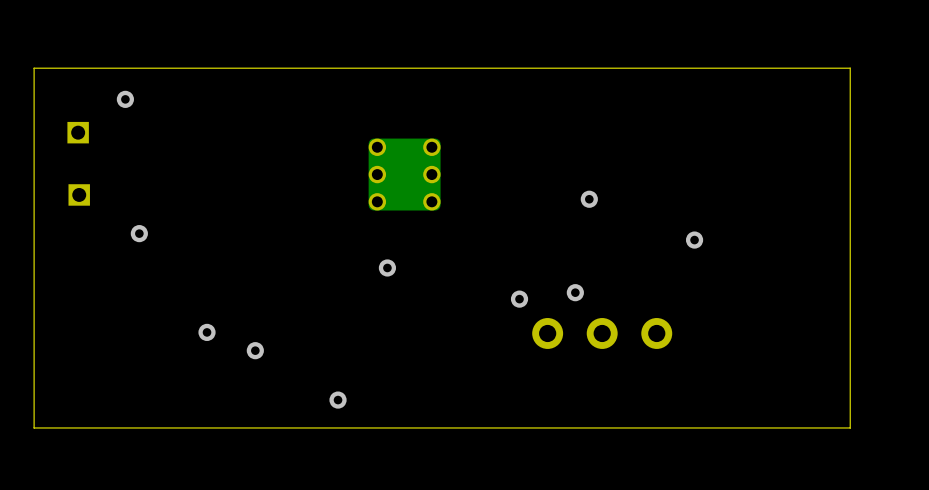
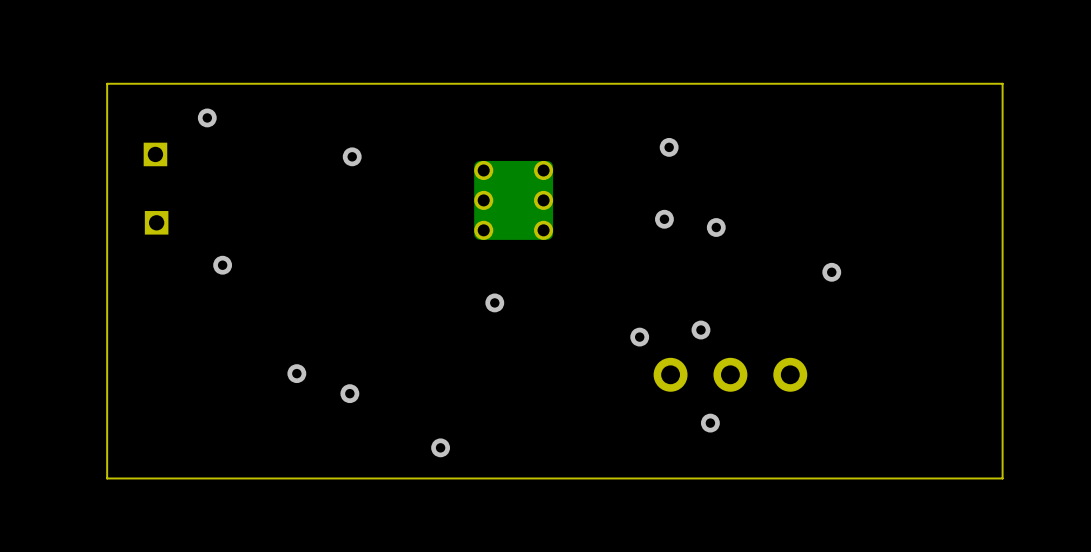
via: none -> (669, 147)
via: none -> (352, 156)
via: none -> (664, 219)
via: none -> (710, 423)

